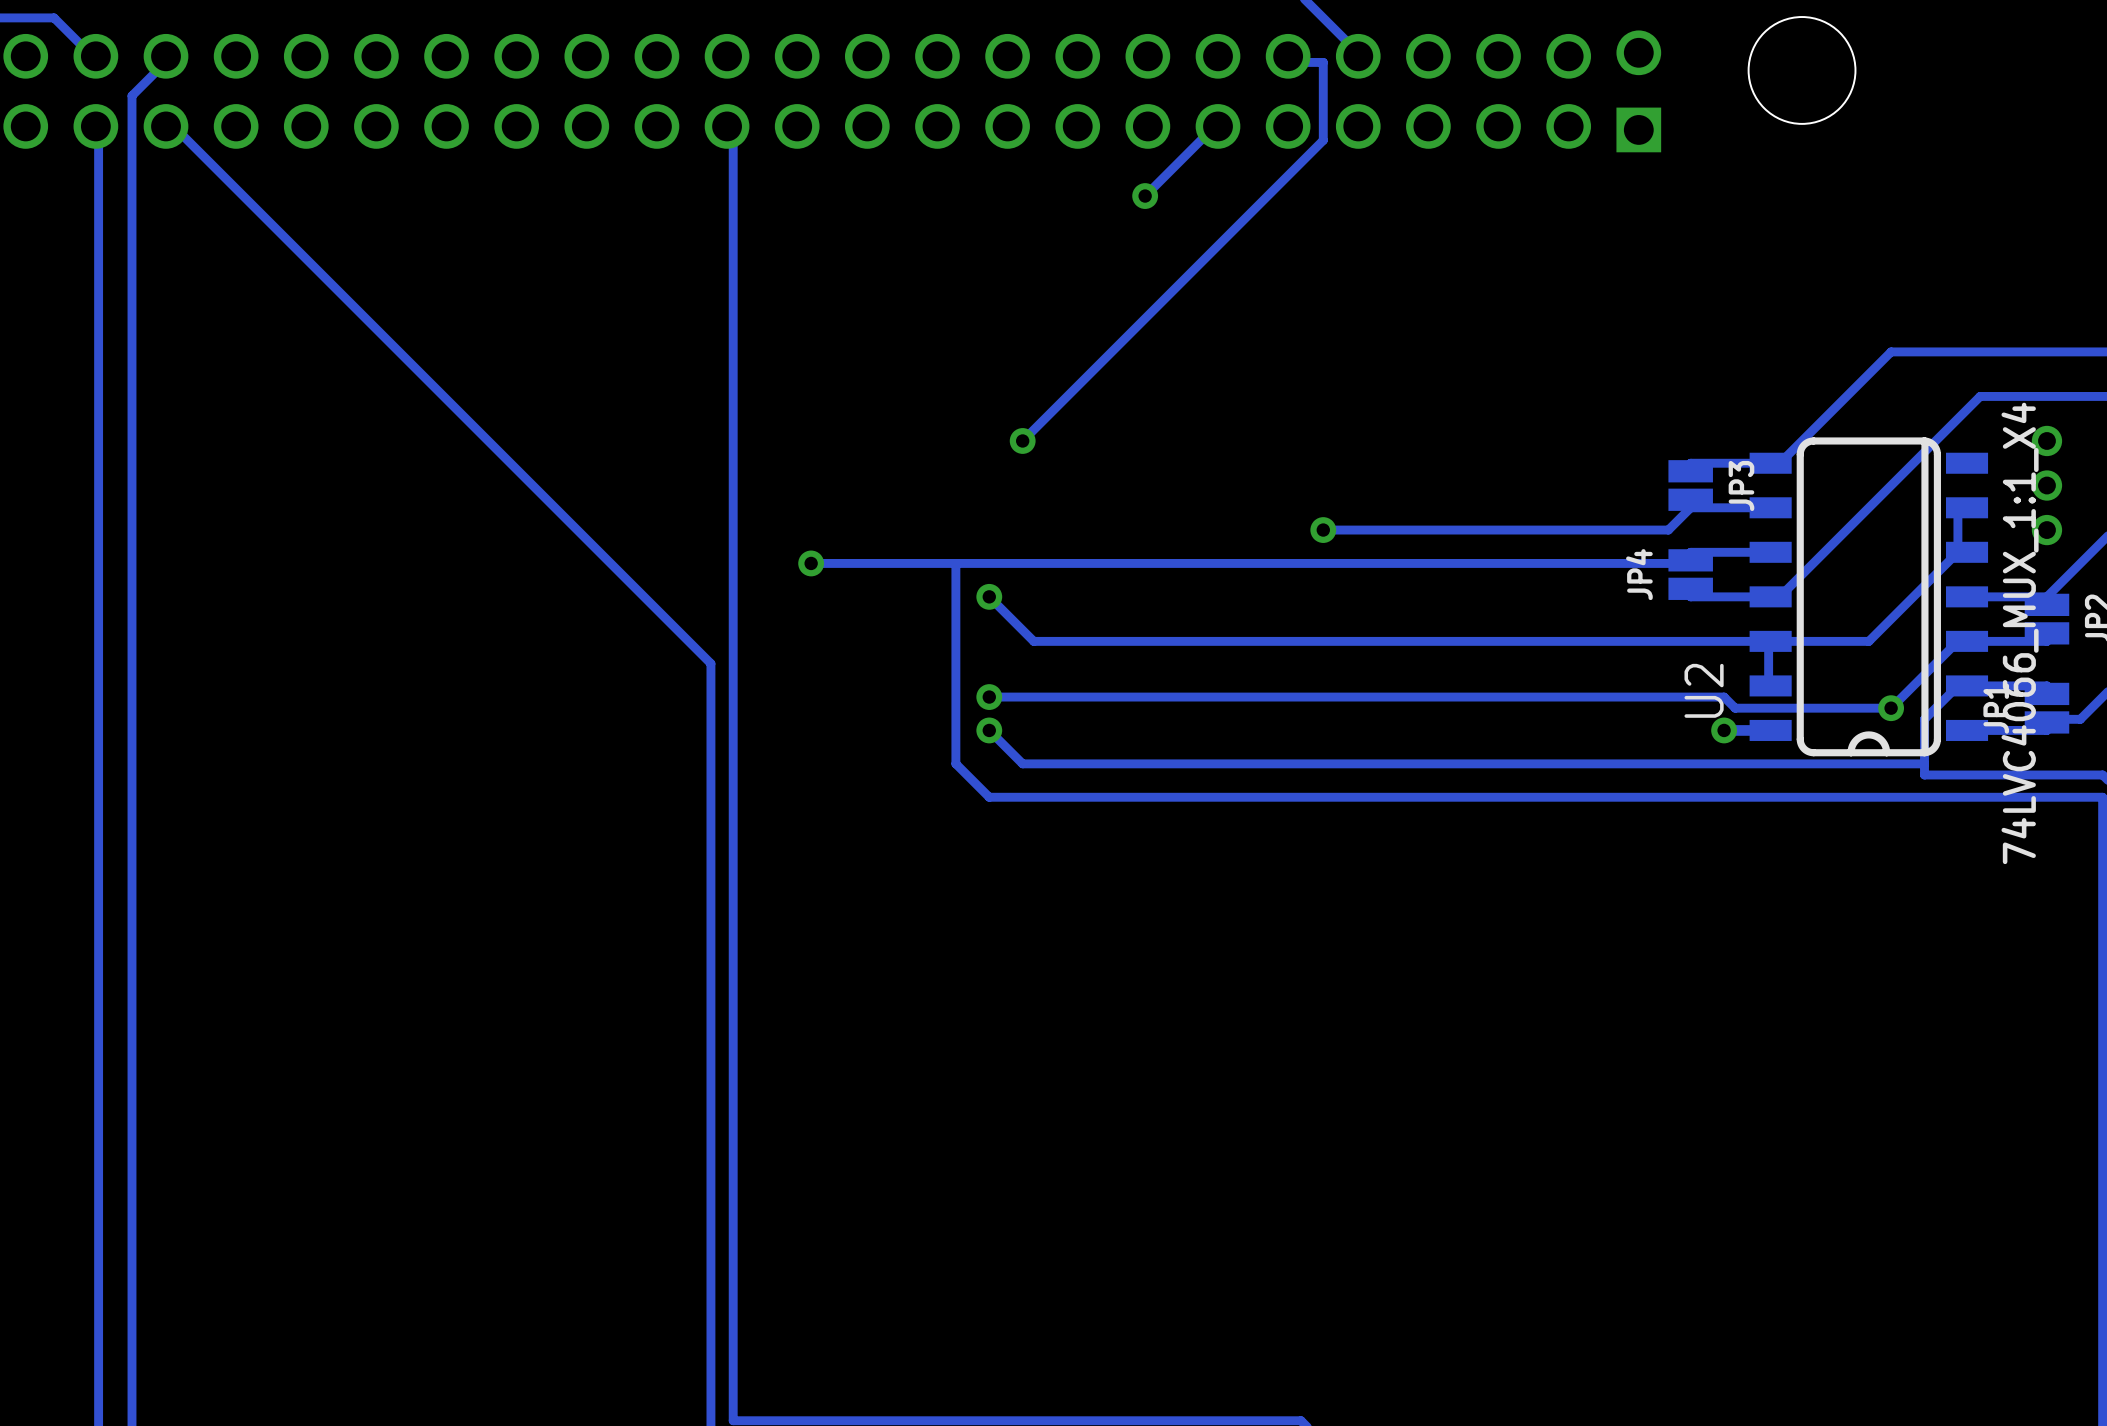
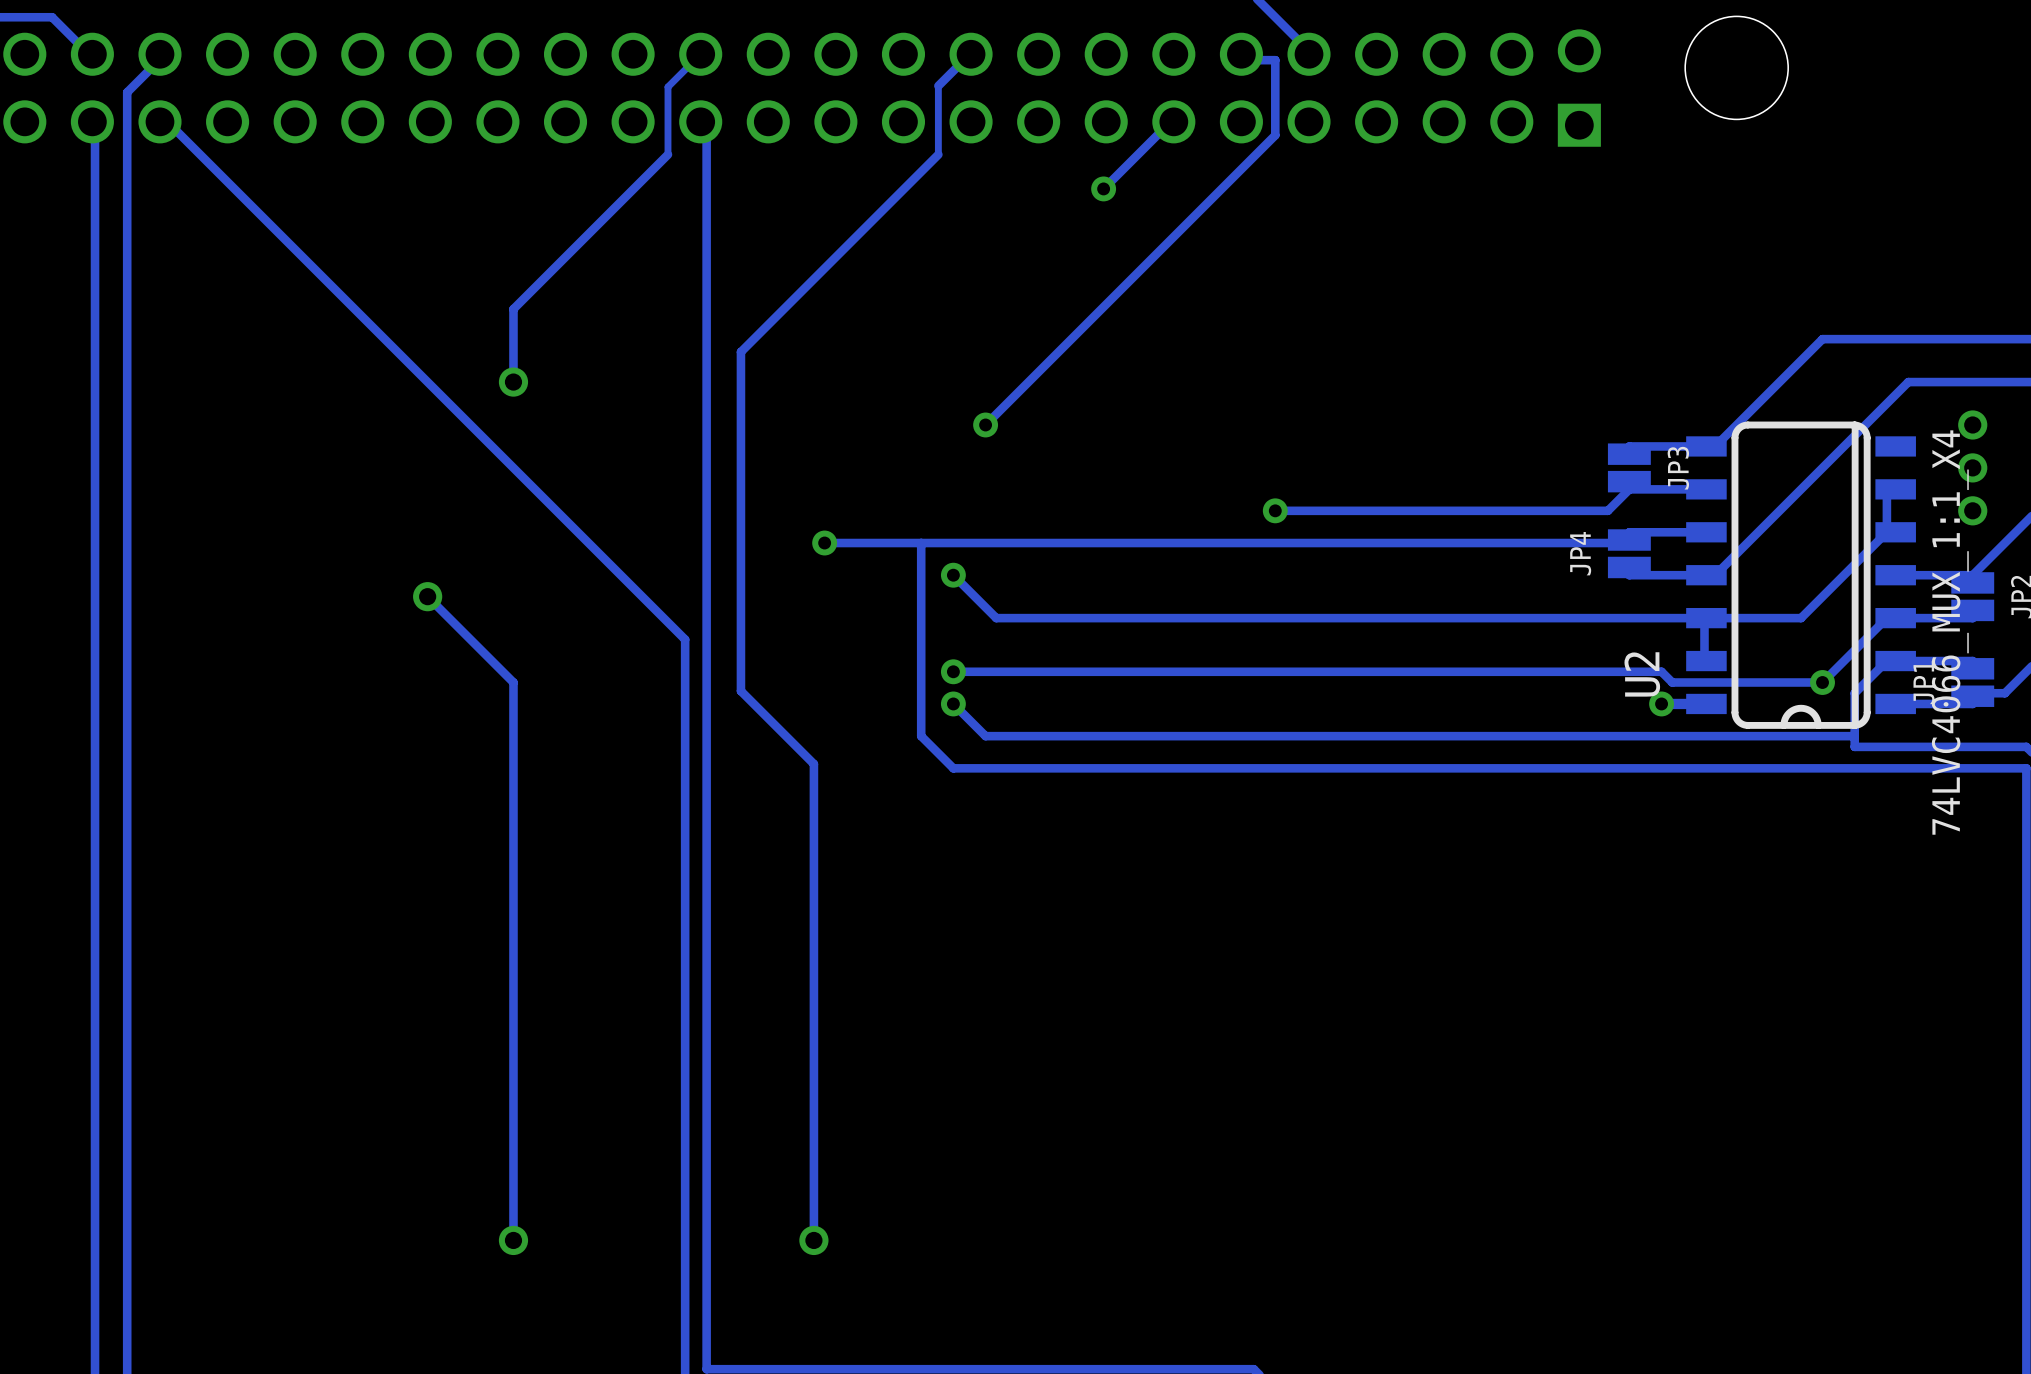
track: none -> (700, 54) (667, 86) (667, 154) (513, 309) (513, 382)
track: none -> (971, 54) (938, 85) (938, 154) (740, 352) (740, 691) (813, 764) (813, 1240)
via: none -> (513, 382)
via position: (811, 563) -> (824, 543)
track: (855, 563) (811, 563) -> none
track: none -> (427, 596) (513, 682) (513, 1240)
via: none -> (427, 596)
via: none -> (513, 1240)
via: none -> (813, 1240)

